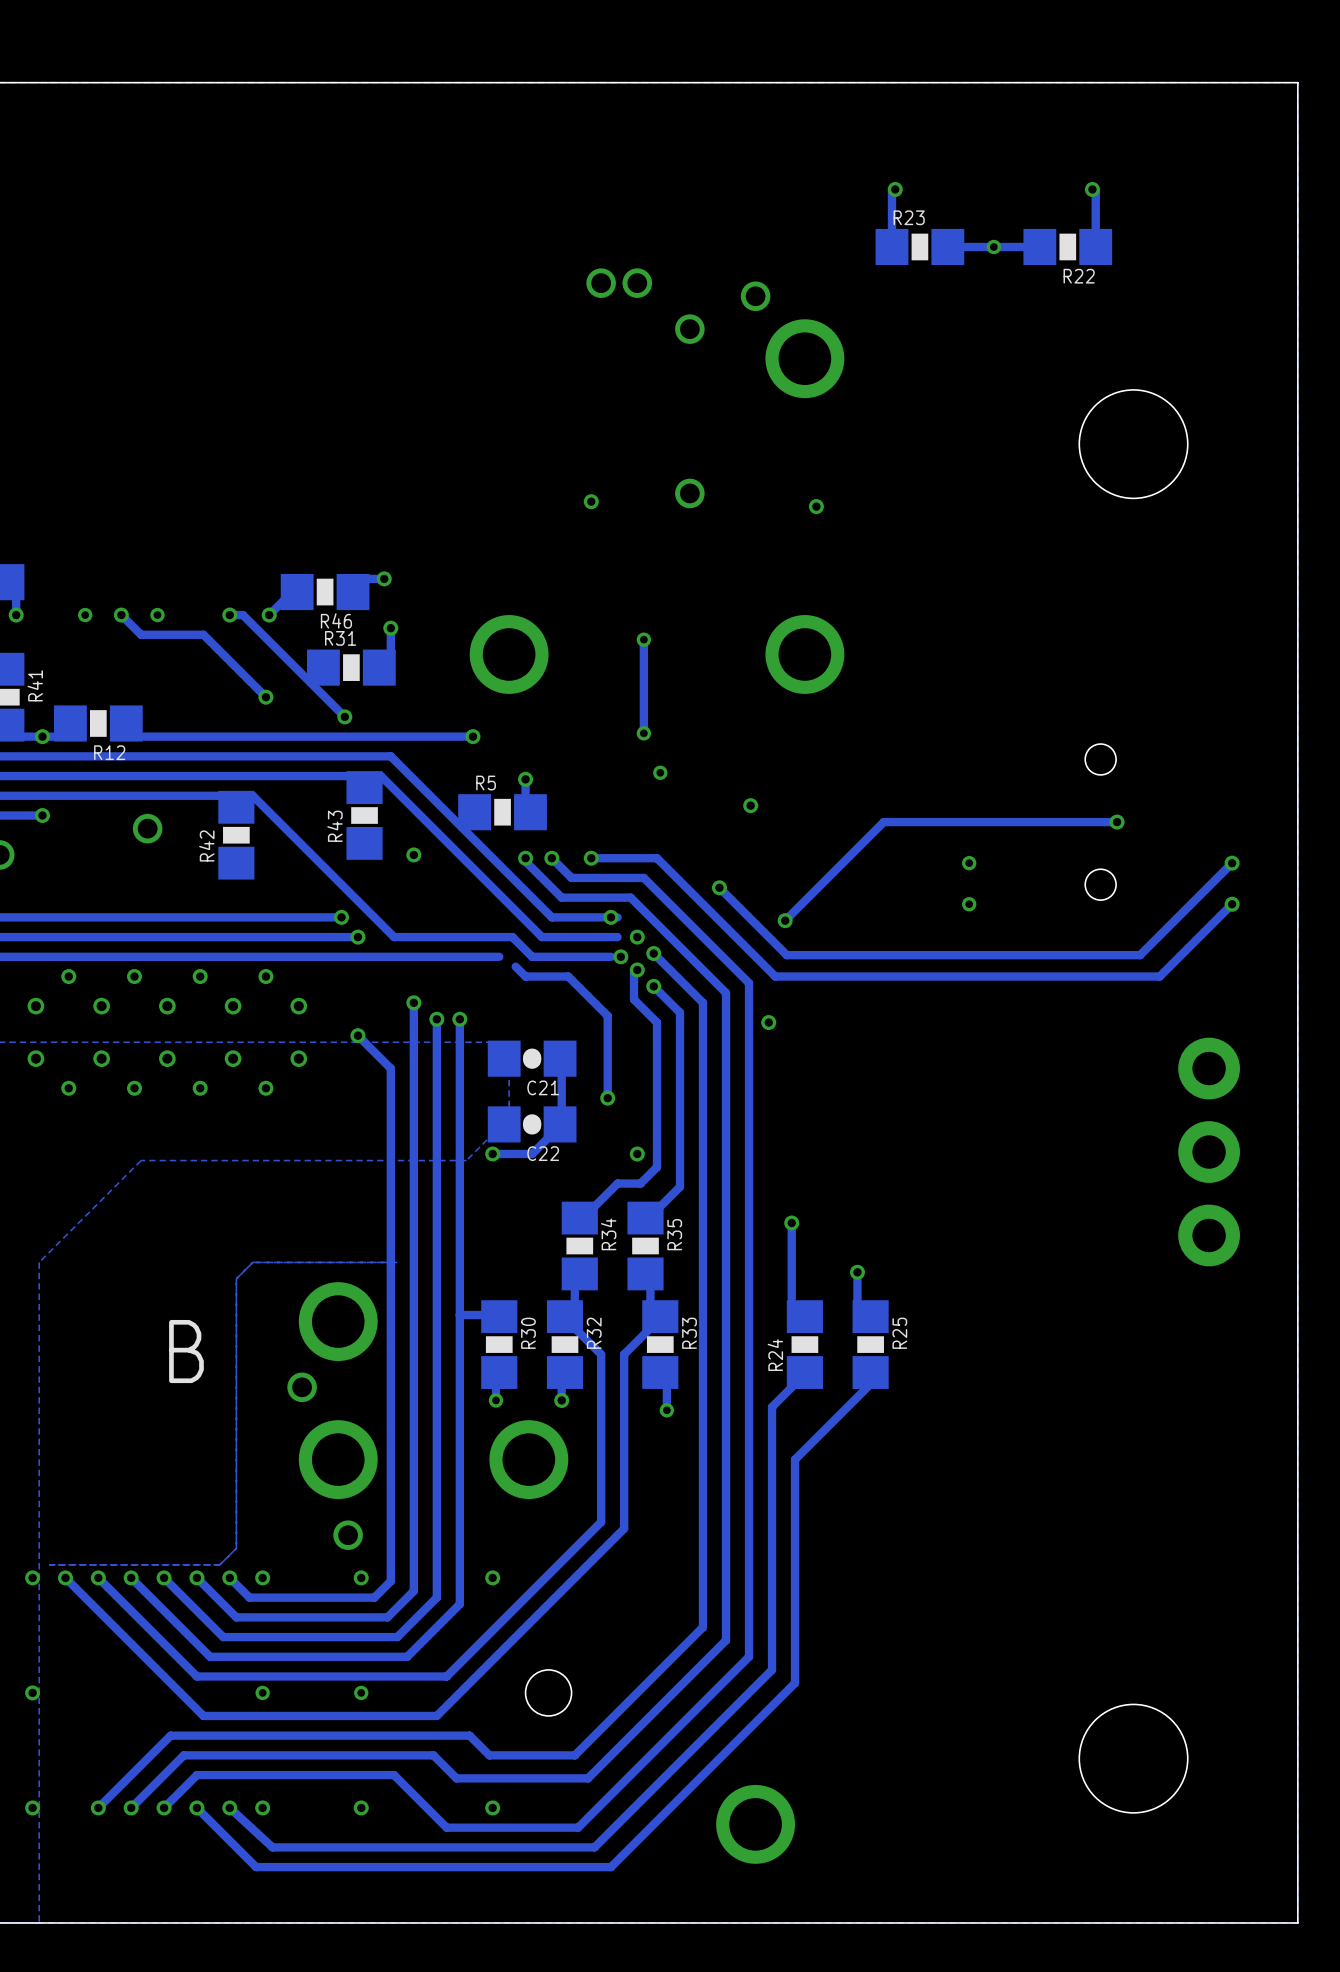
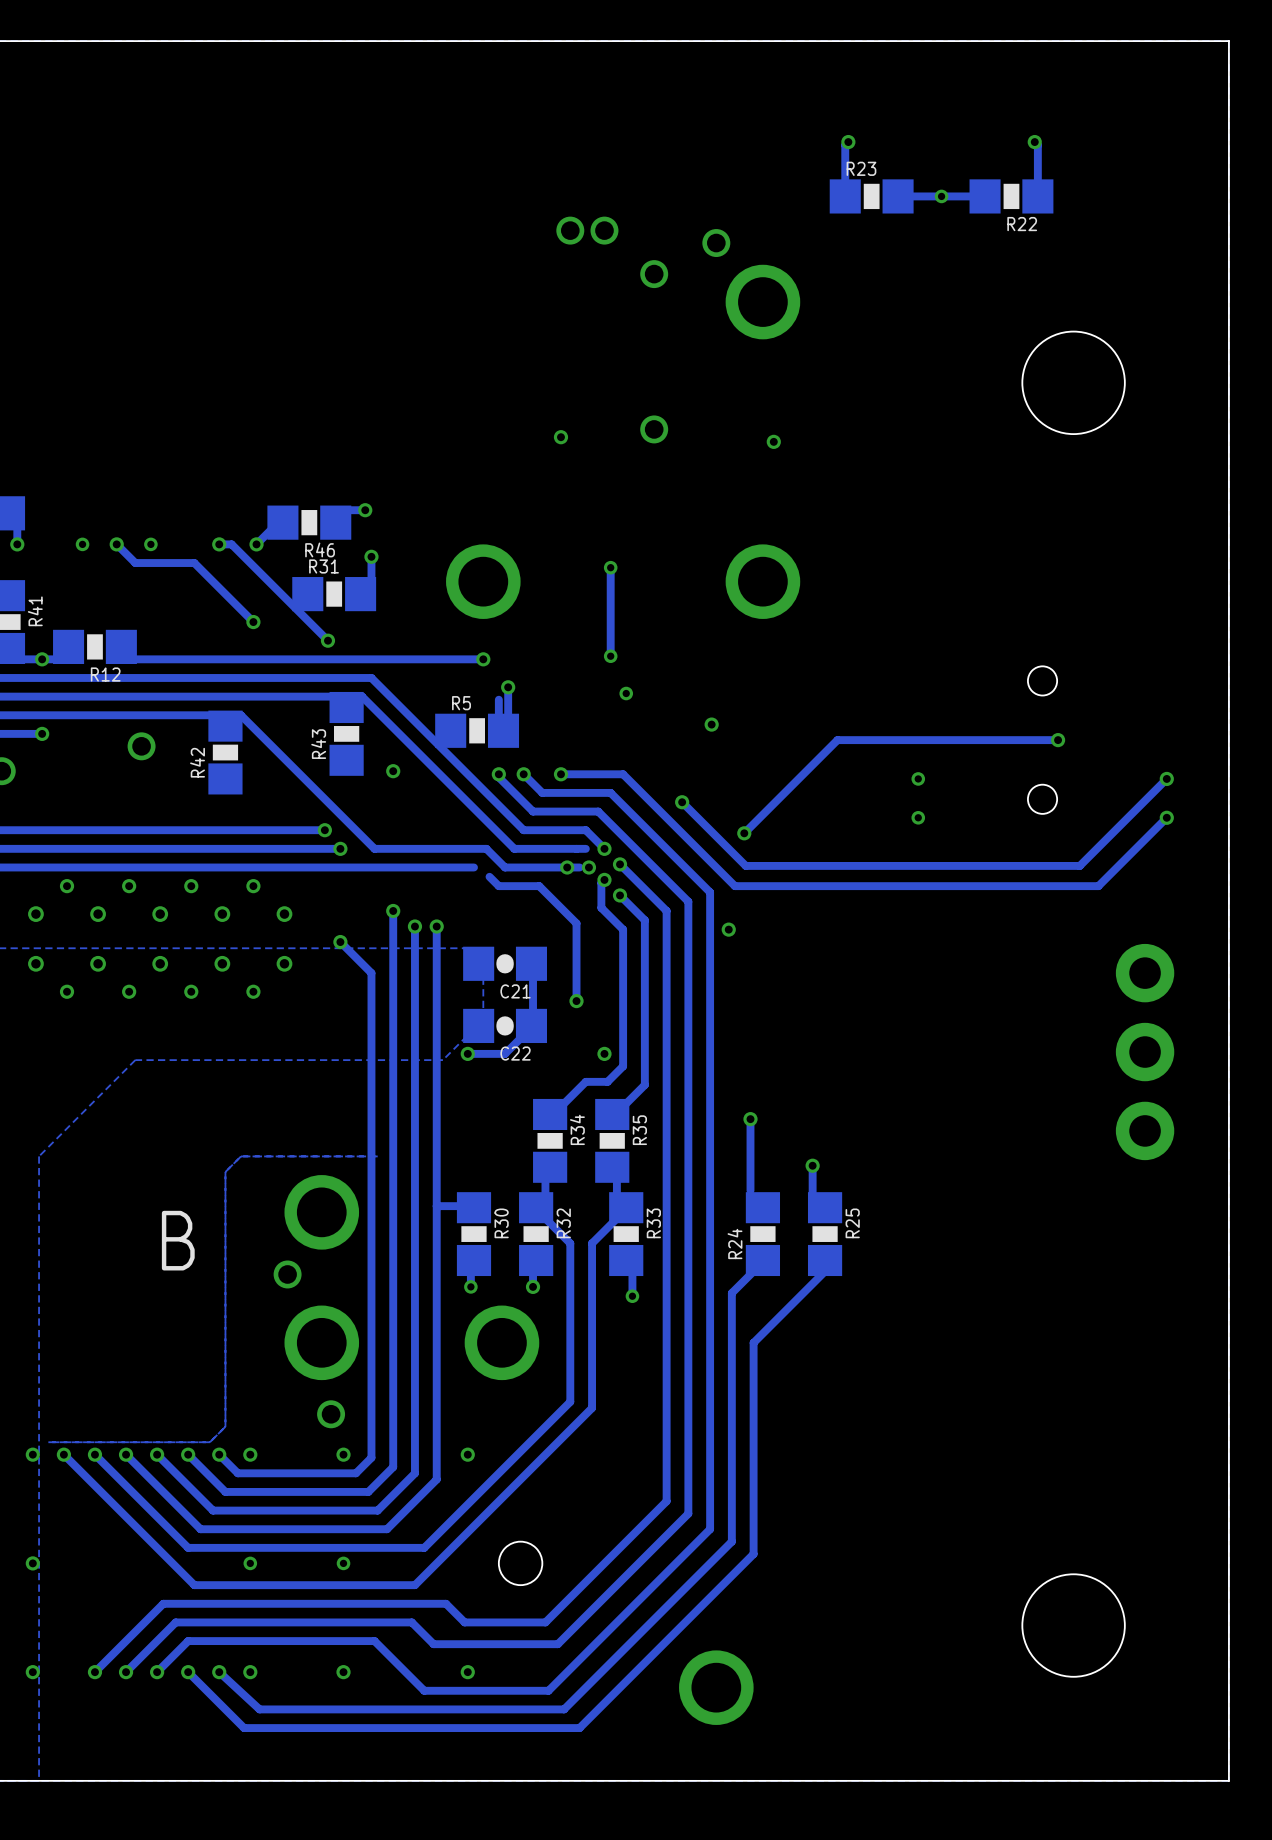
via: (472, 736) -> none
track: none -> (483, 659) (449, 659)
via: none -> (483, 659)
track: none -> (508, 687) (508, 715)
via position: (525, 779) -> (508, 687)
via position: (611, 917) -> (567, 867)
track: none -> (585, 830) (604, 848)

